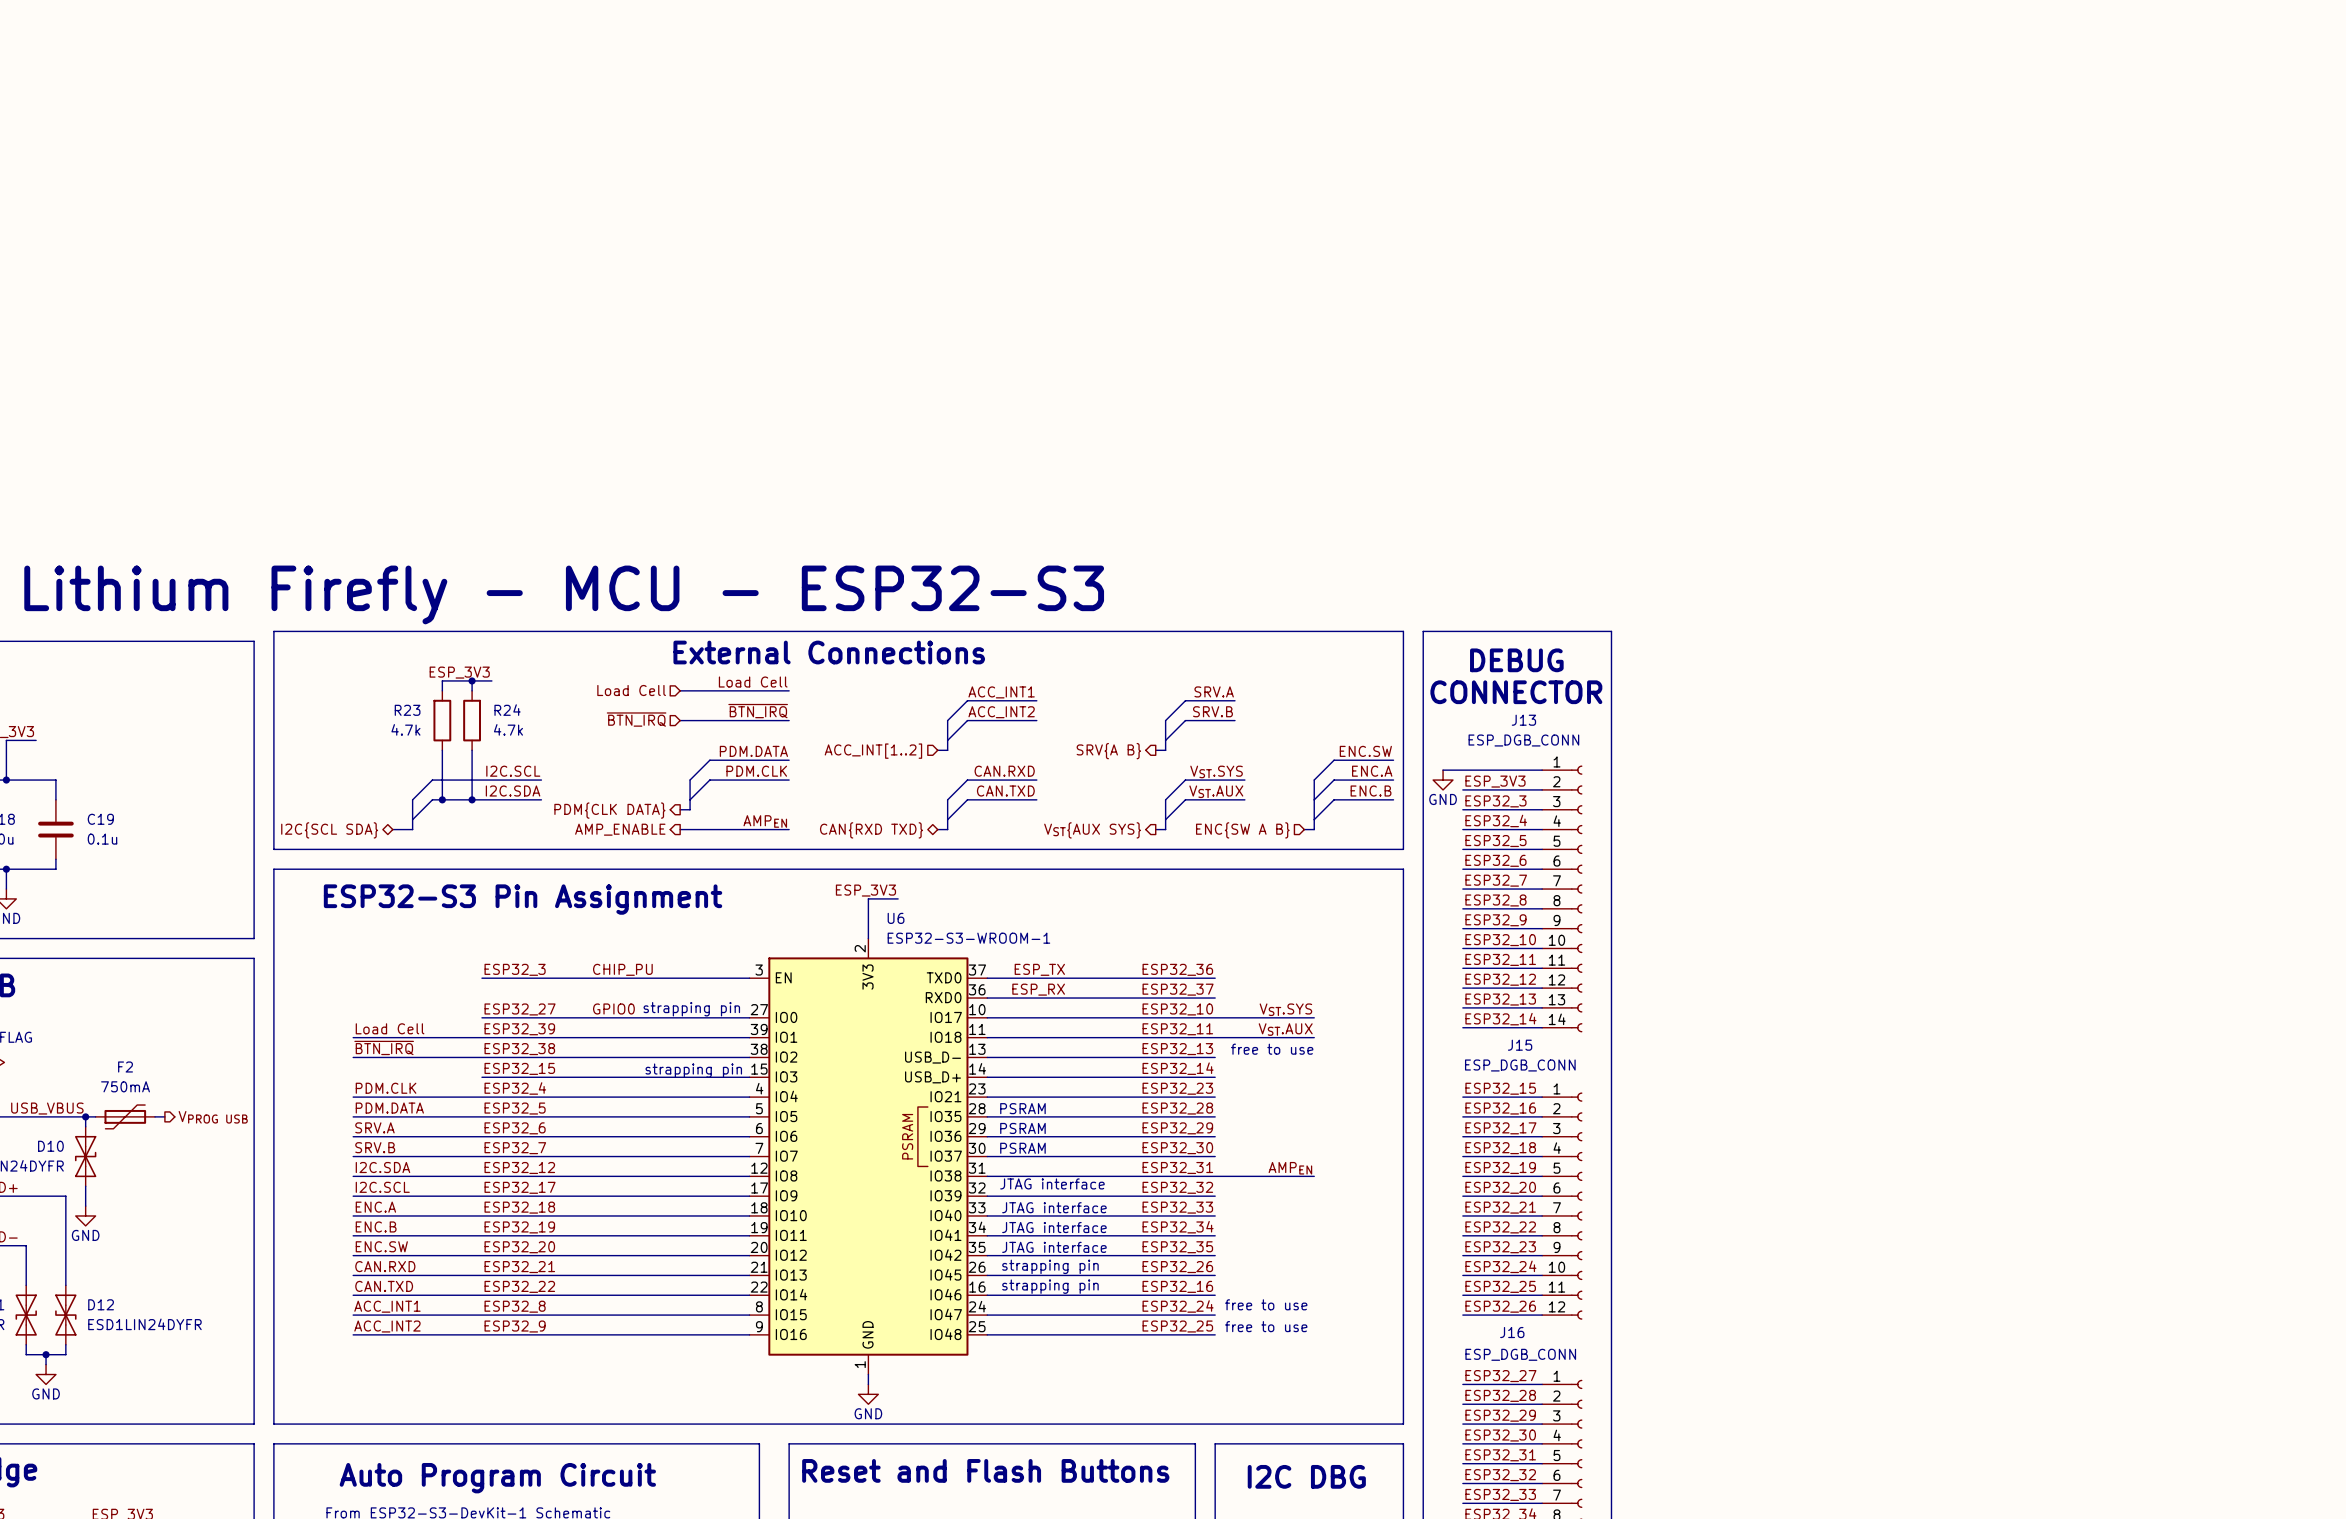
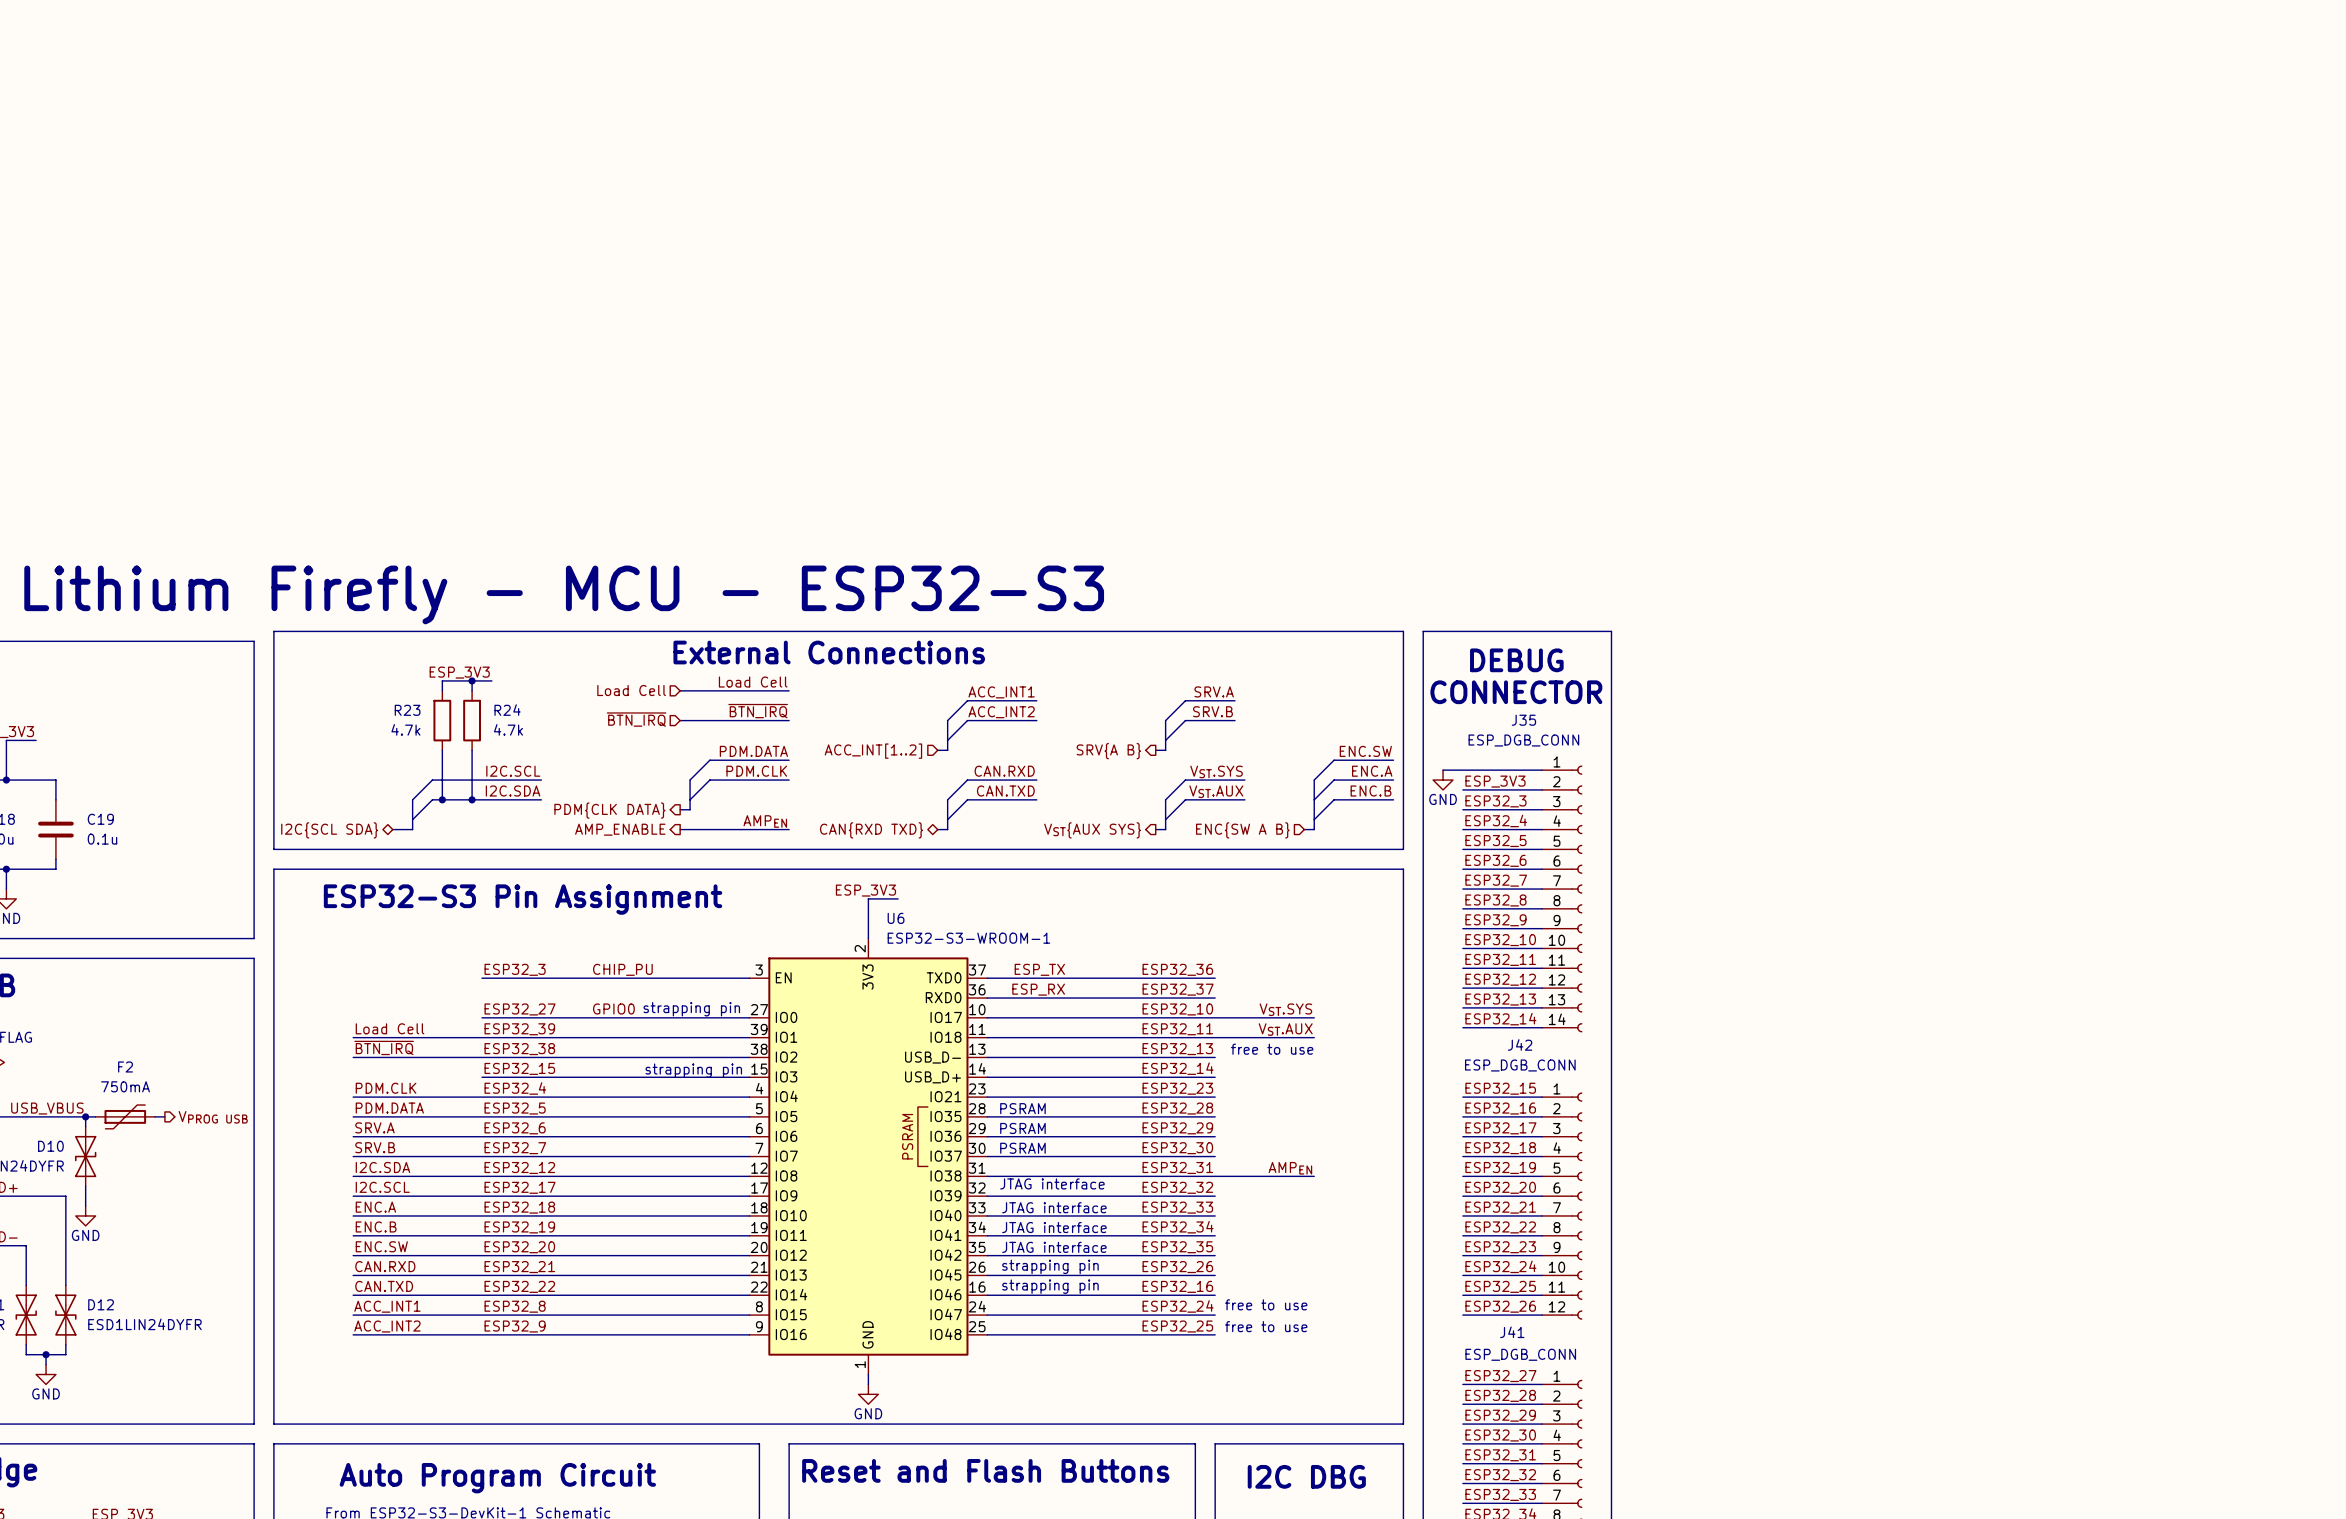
J13 name: J13 (1523, 720) -> J35 (1523, 720)
J15 name: J15 (1520, 1045) -> J42 (1520, 1044)
J16 name: J16 (1512, 1332) -> J41 (1512, 1332)

